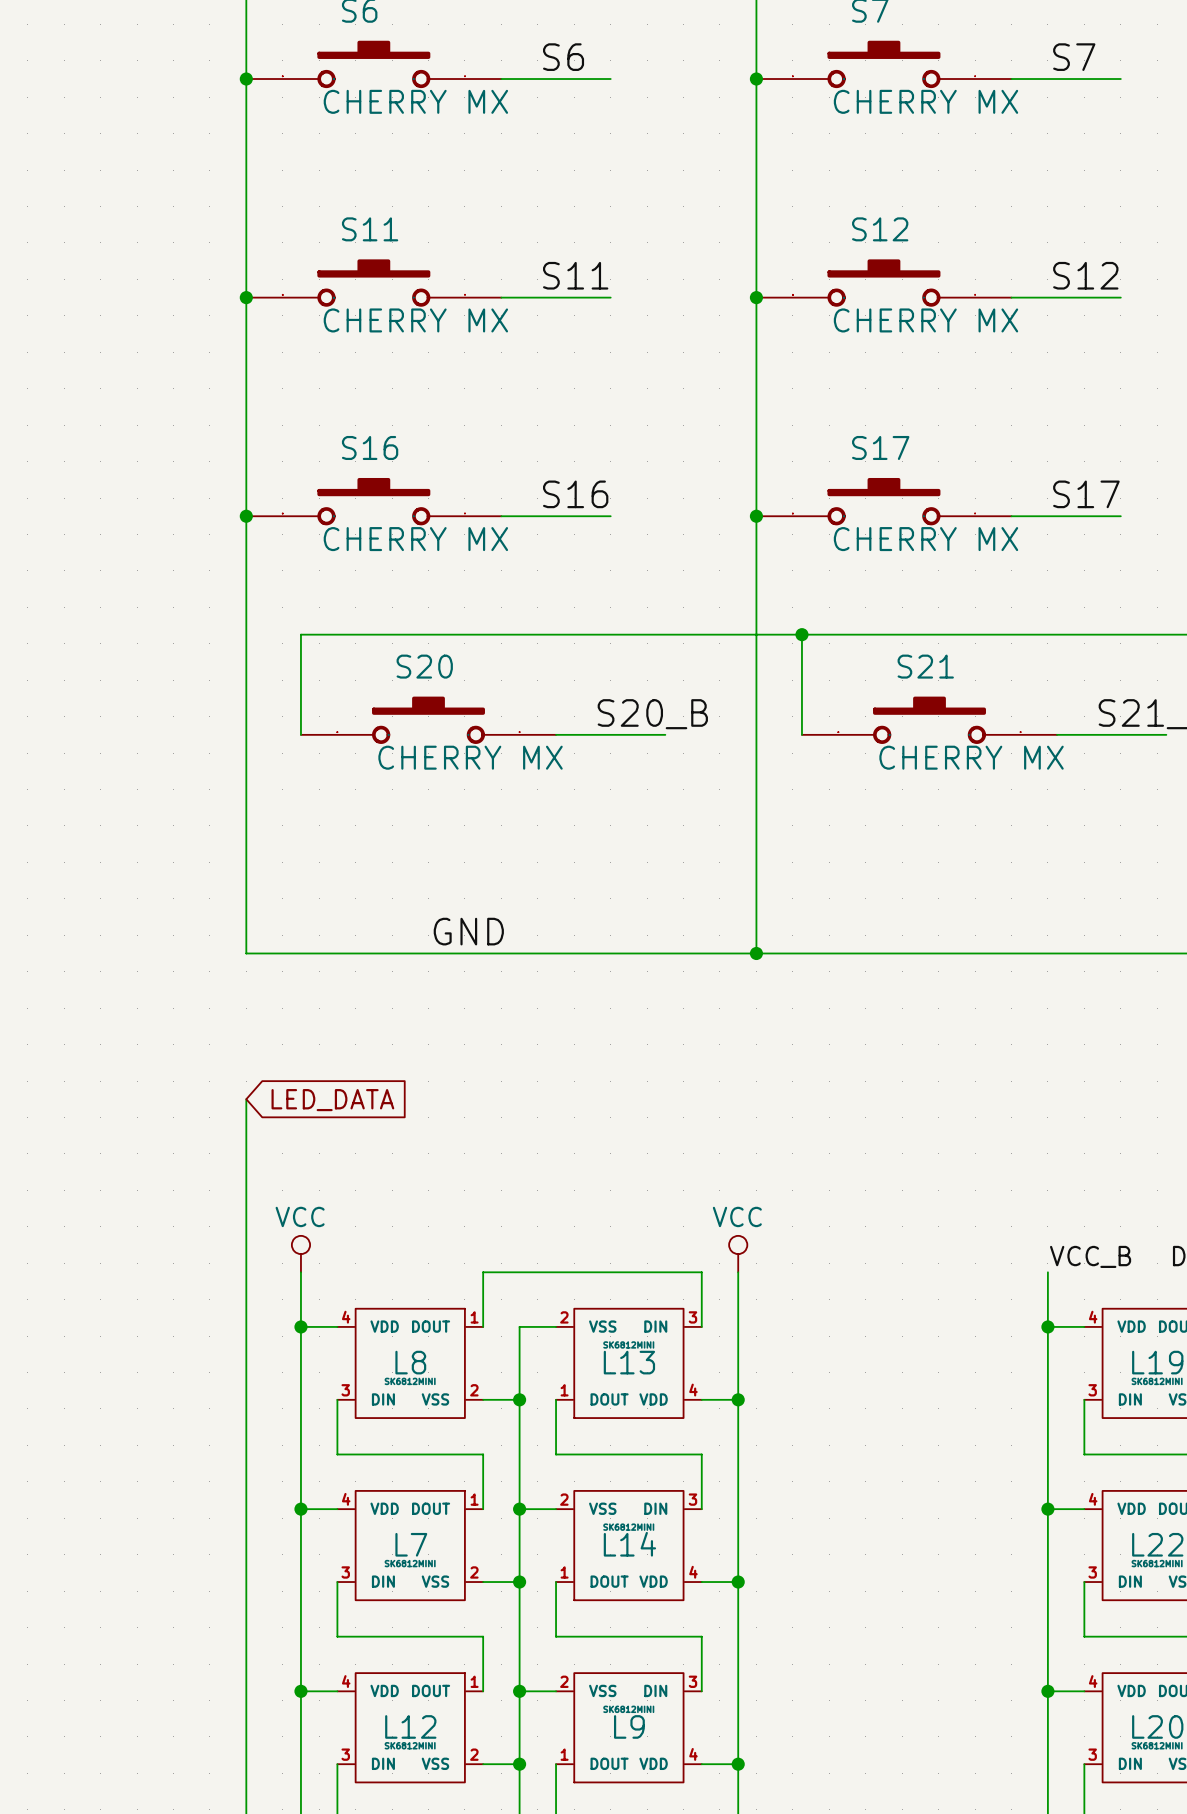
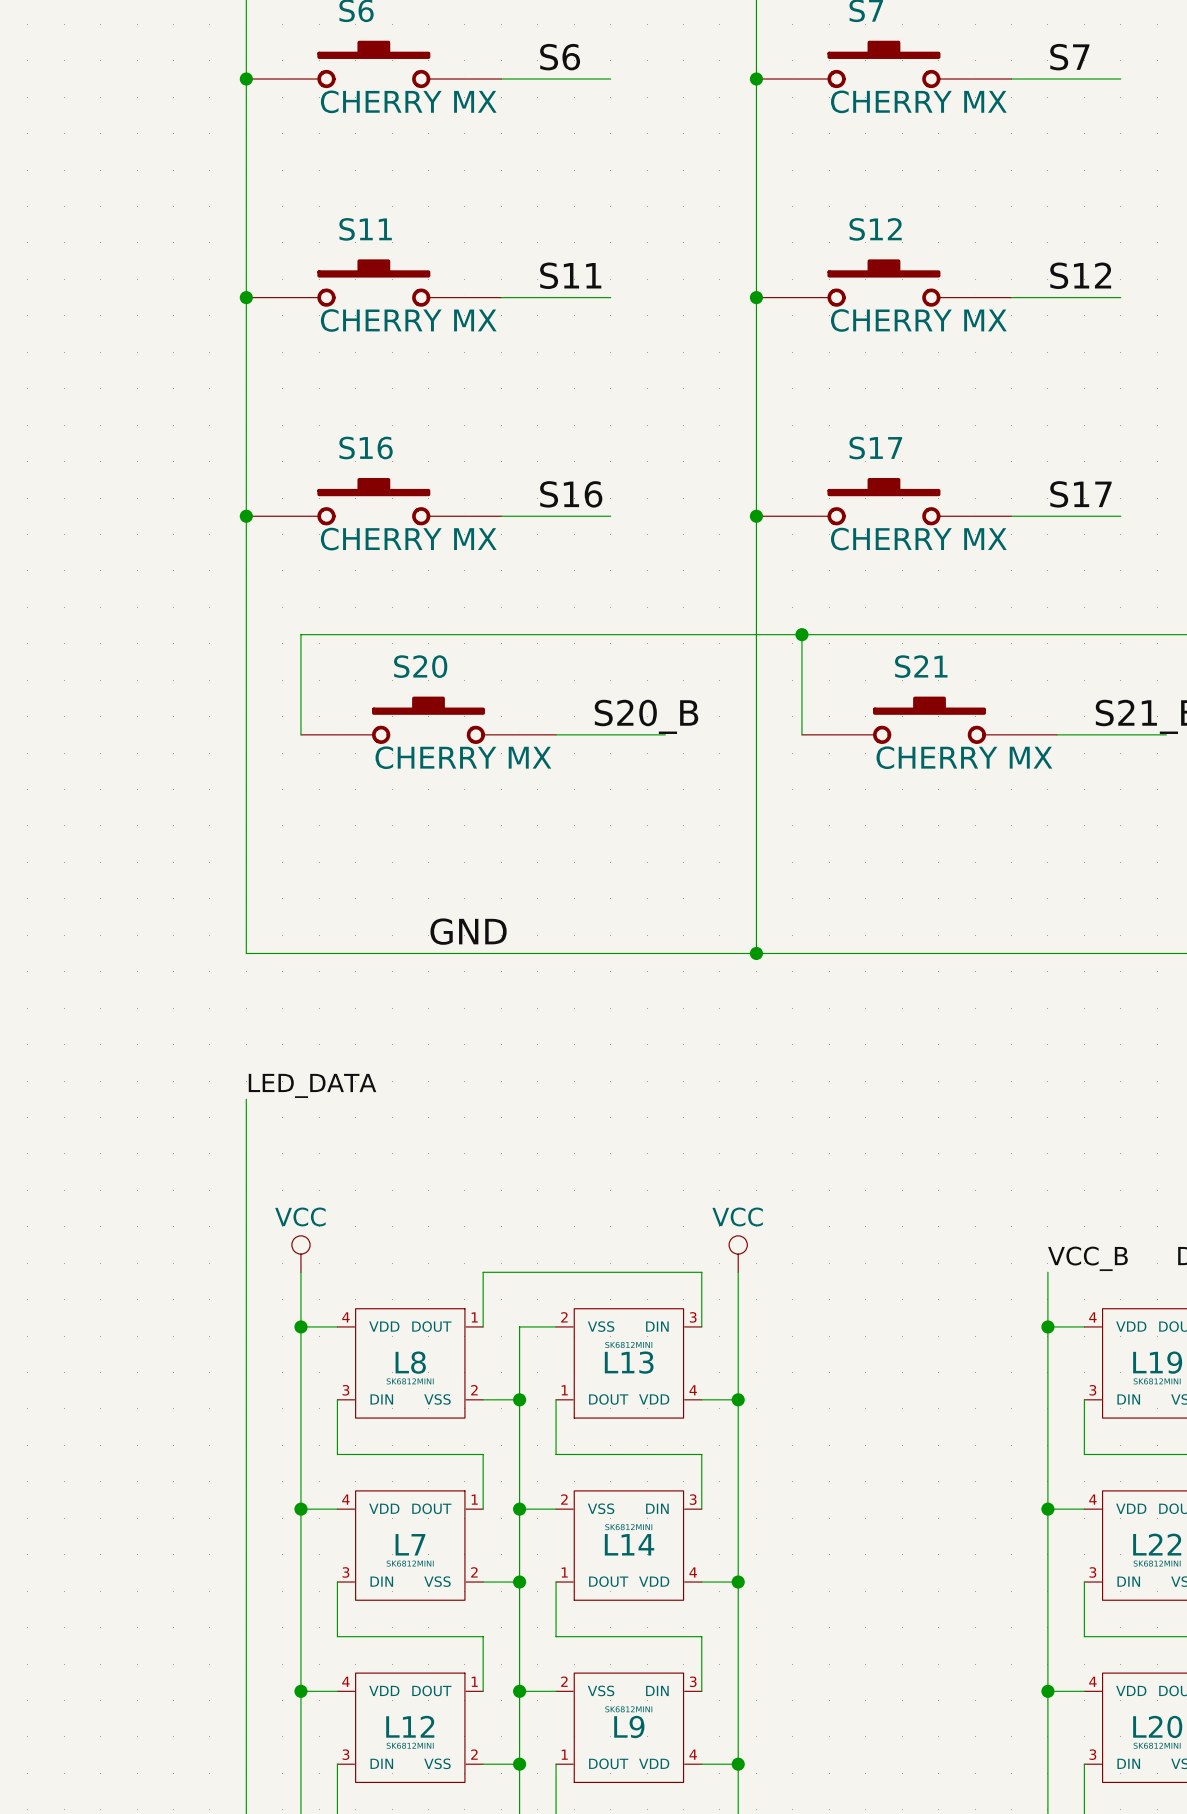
label: none -> LED_DATA (312, 1085)
global label: LED_DATA (332, 1100) -> none

